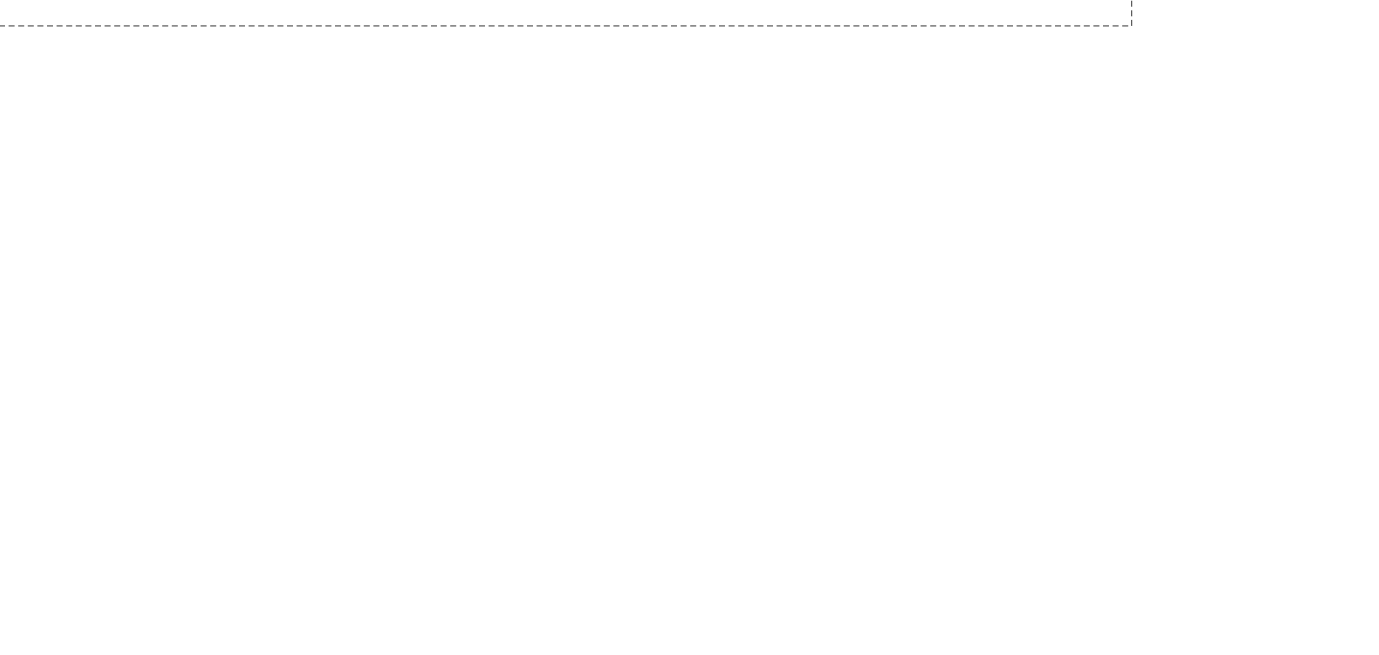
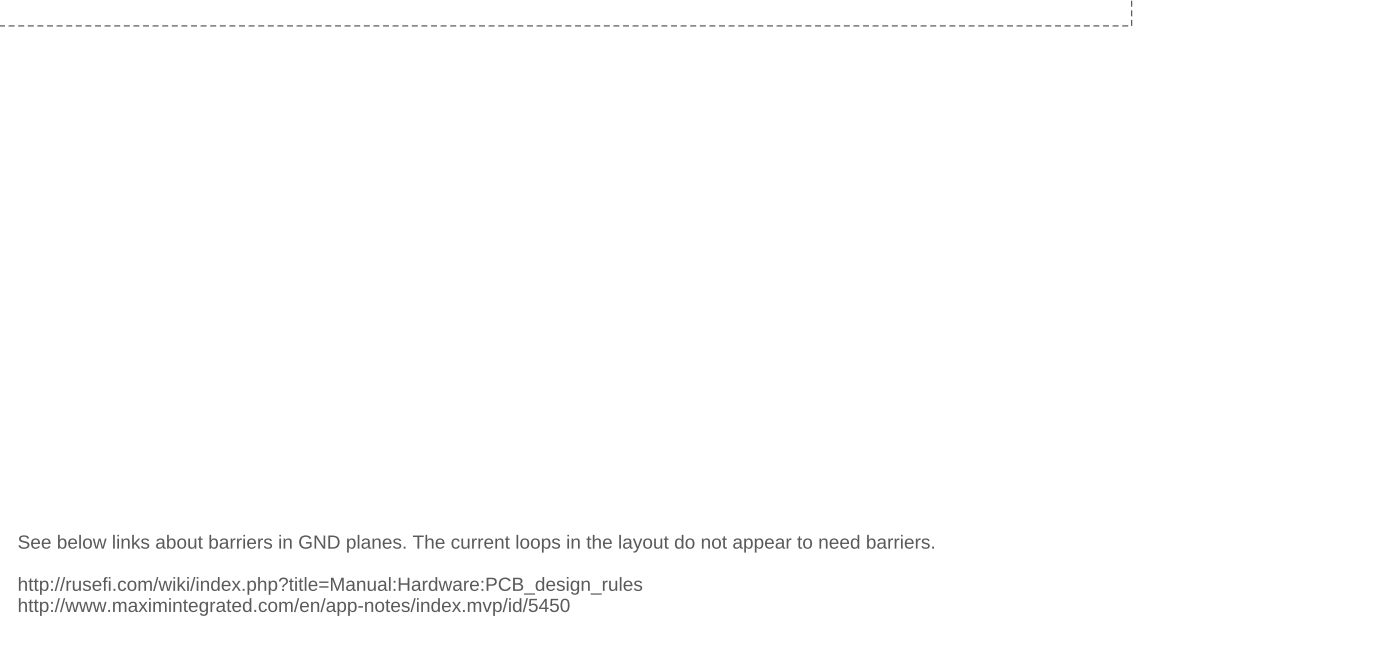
text: none -> See below links about barriers in GND planes. The current loops in the layout do not appear to need barriers. (476, 543)
text: none -> http://rusefi.com/wiki/index.php?title=Manual:Hardware:PCB_design_rules (330, 585)
text: none -> http://www.maximintegrated.com/en/app-notes/index.mvp/id/5450 (294, 607)

